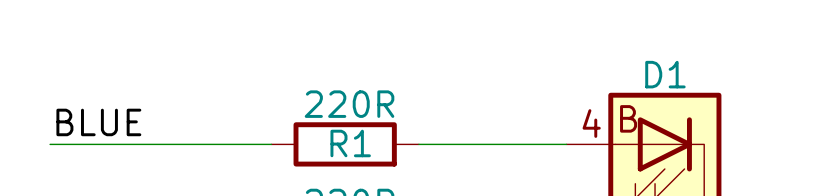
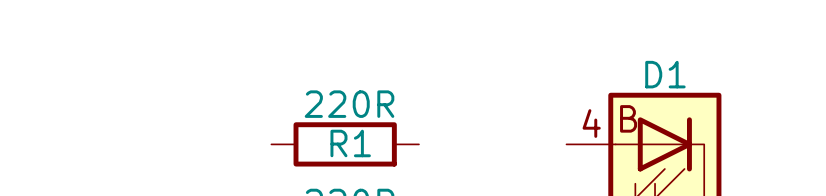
label: BLUE (98, 122) -> none
wire: (50, 144) (271, 144) -> none
wire: (418, 144) (566, 144) -> none

